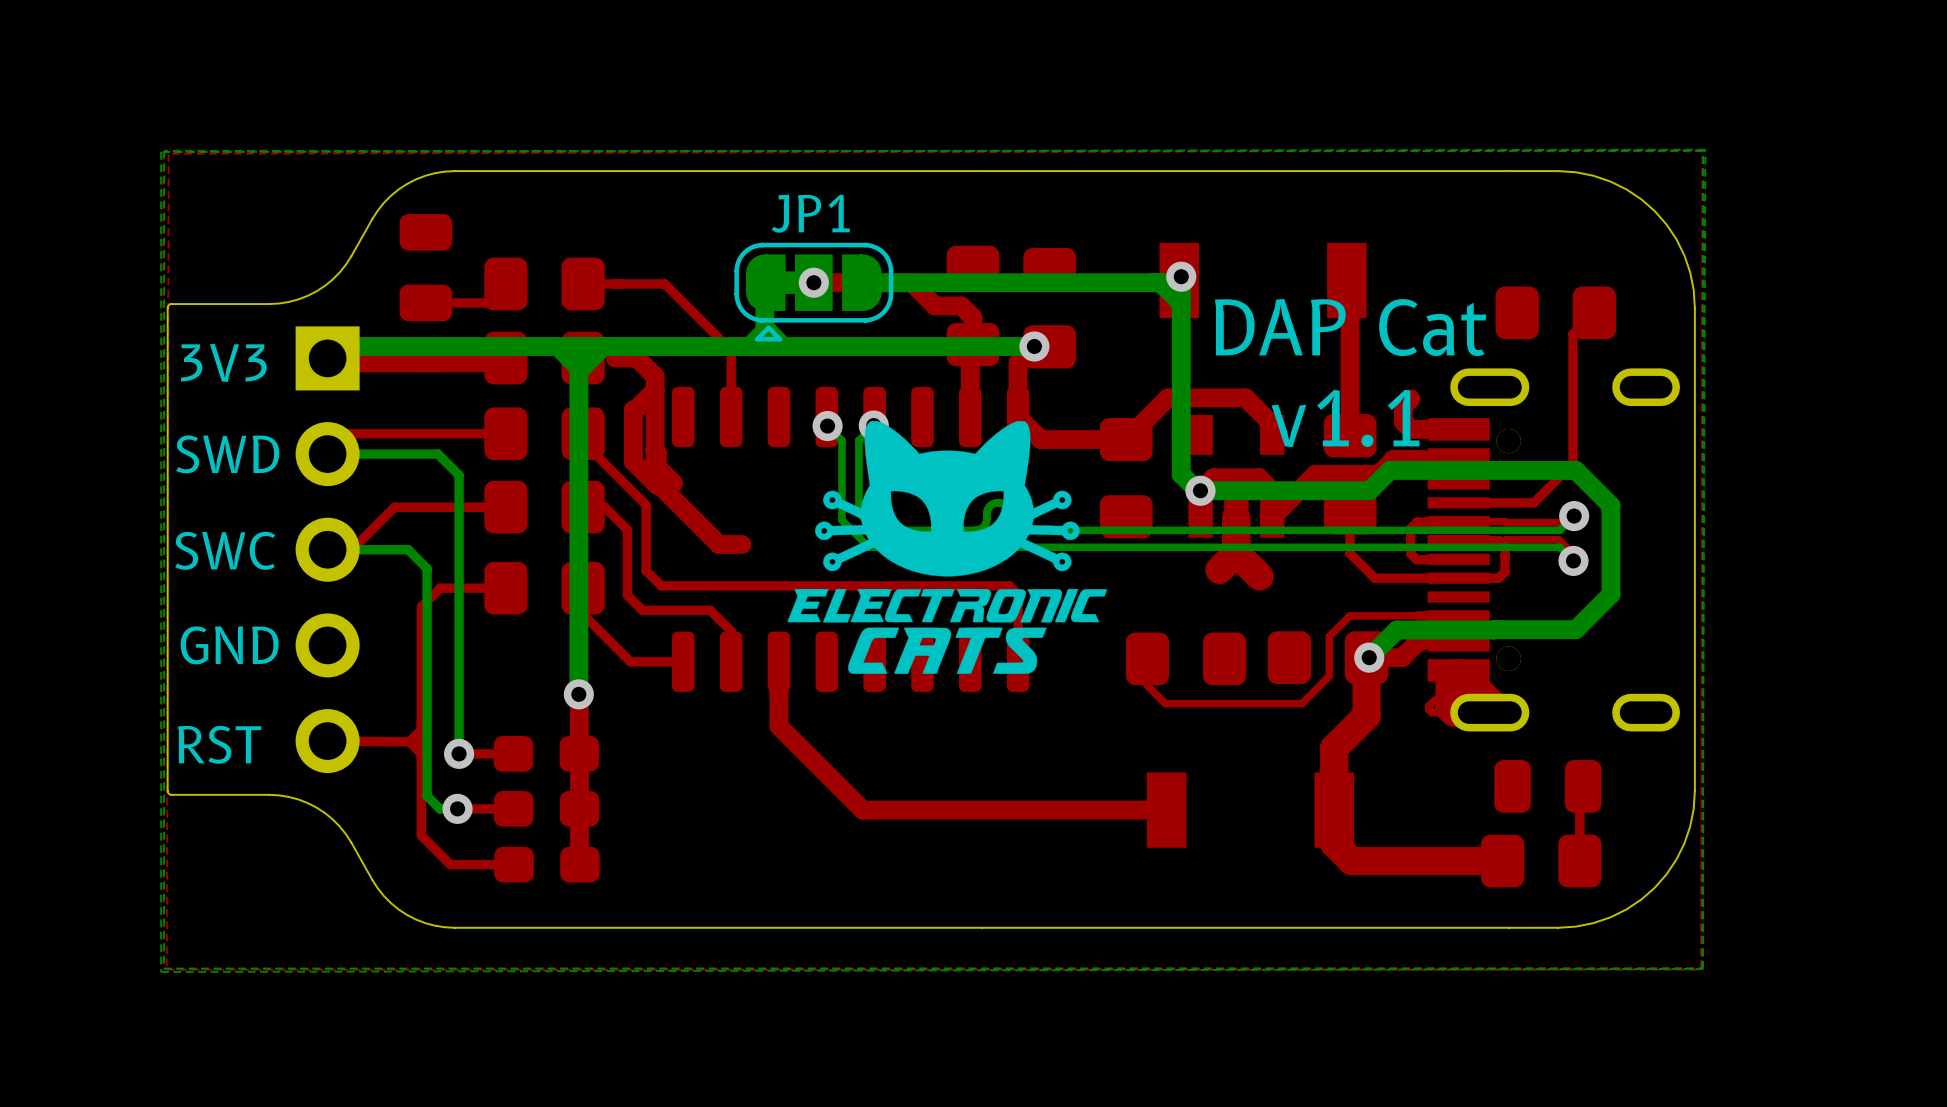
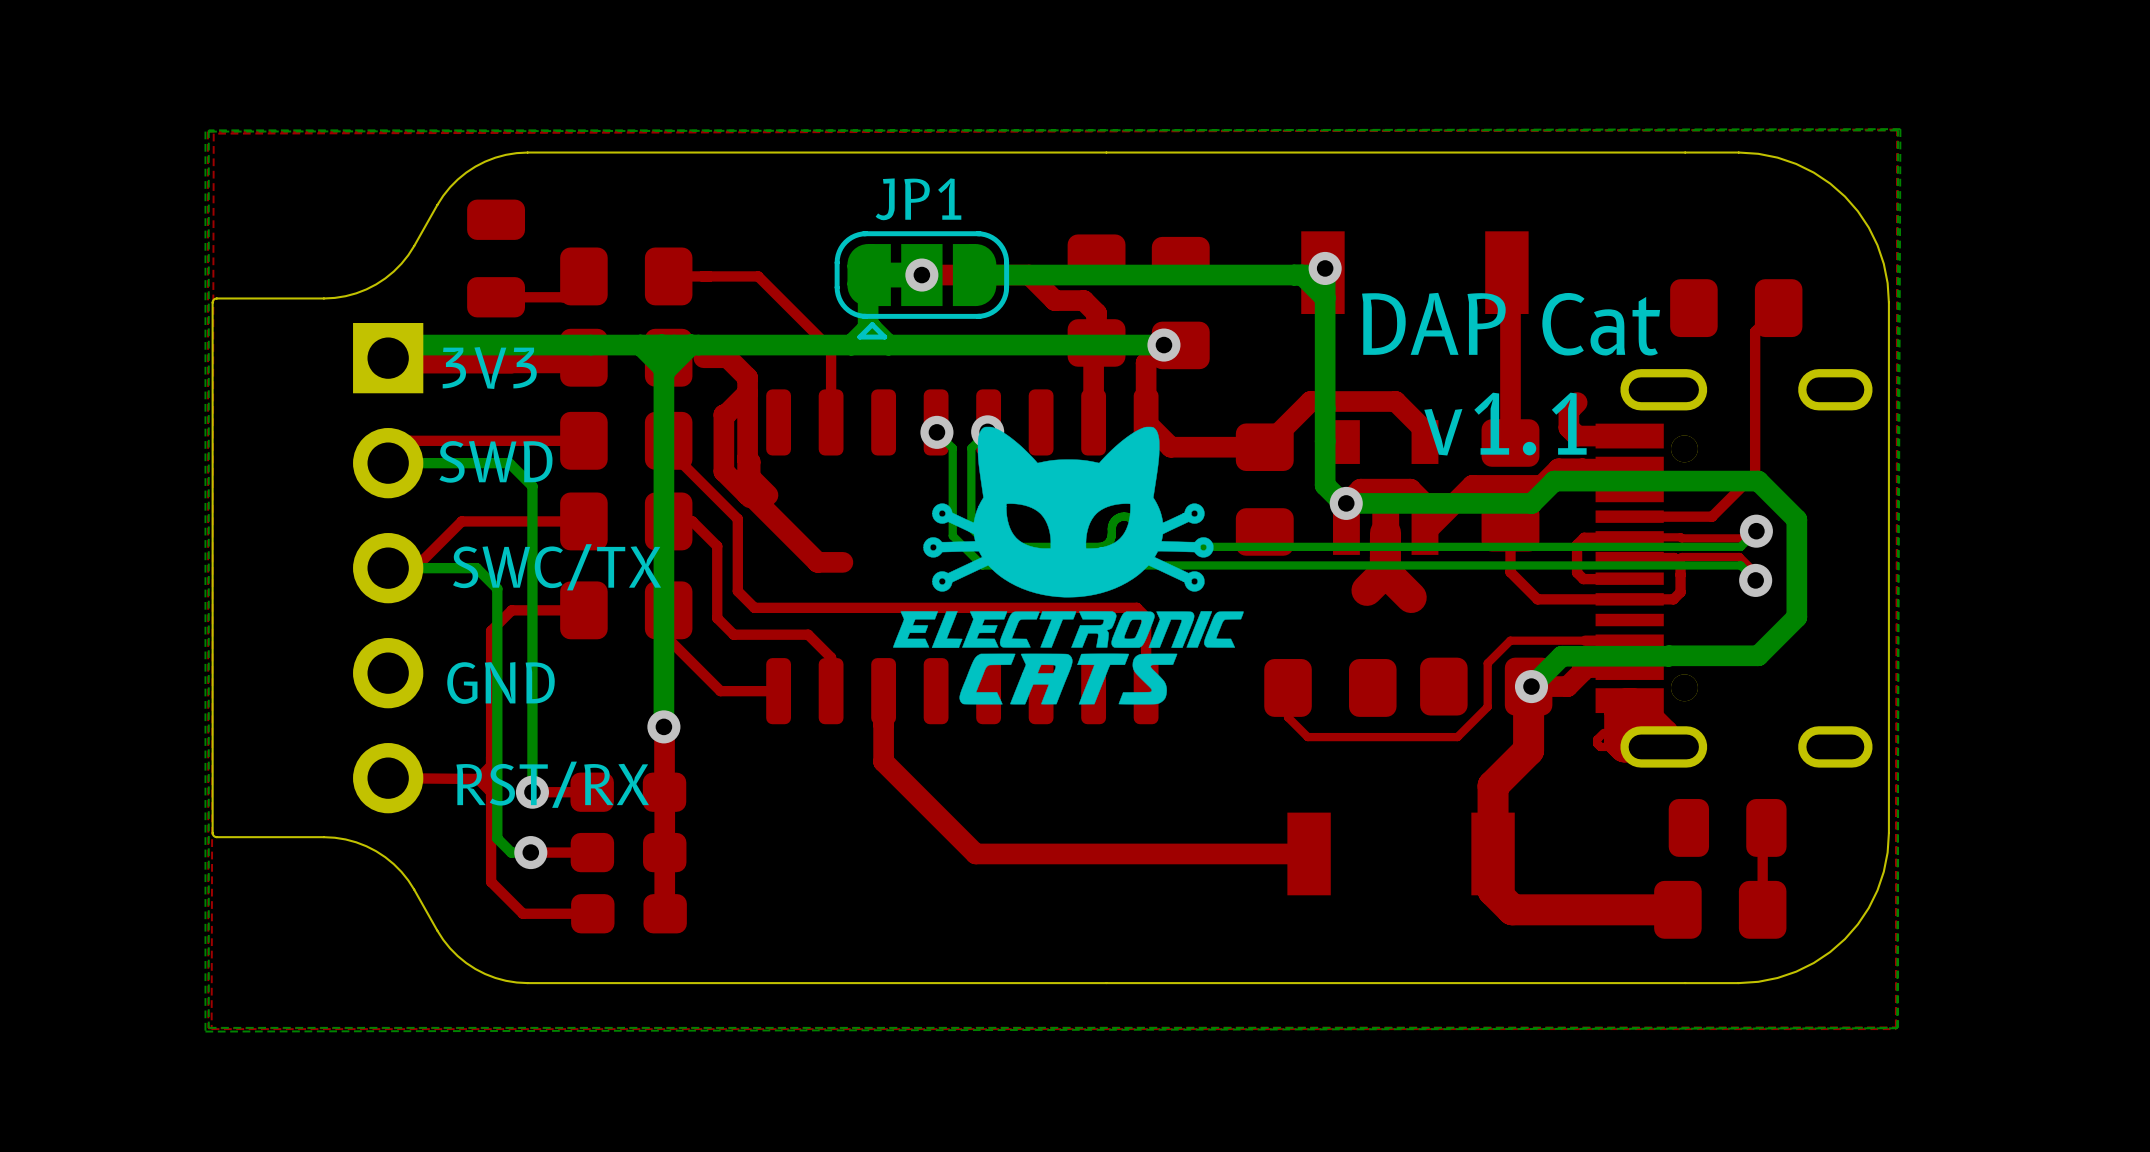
text position: 3V3 (223, 362) -> 3V3 (489, 368)
text position: SWD (227, 454) -> SWD (495, 461)
text: none -> SWC/TX (557, 567)
text: SWC (225, 550) -> none
text position: GND (229, 645) -> GND (501, 683)
text: RST (219, 744) -> none
text: none -> RST/RX (552, 784)

